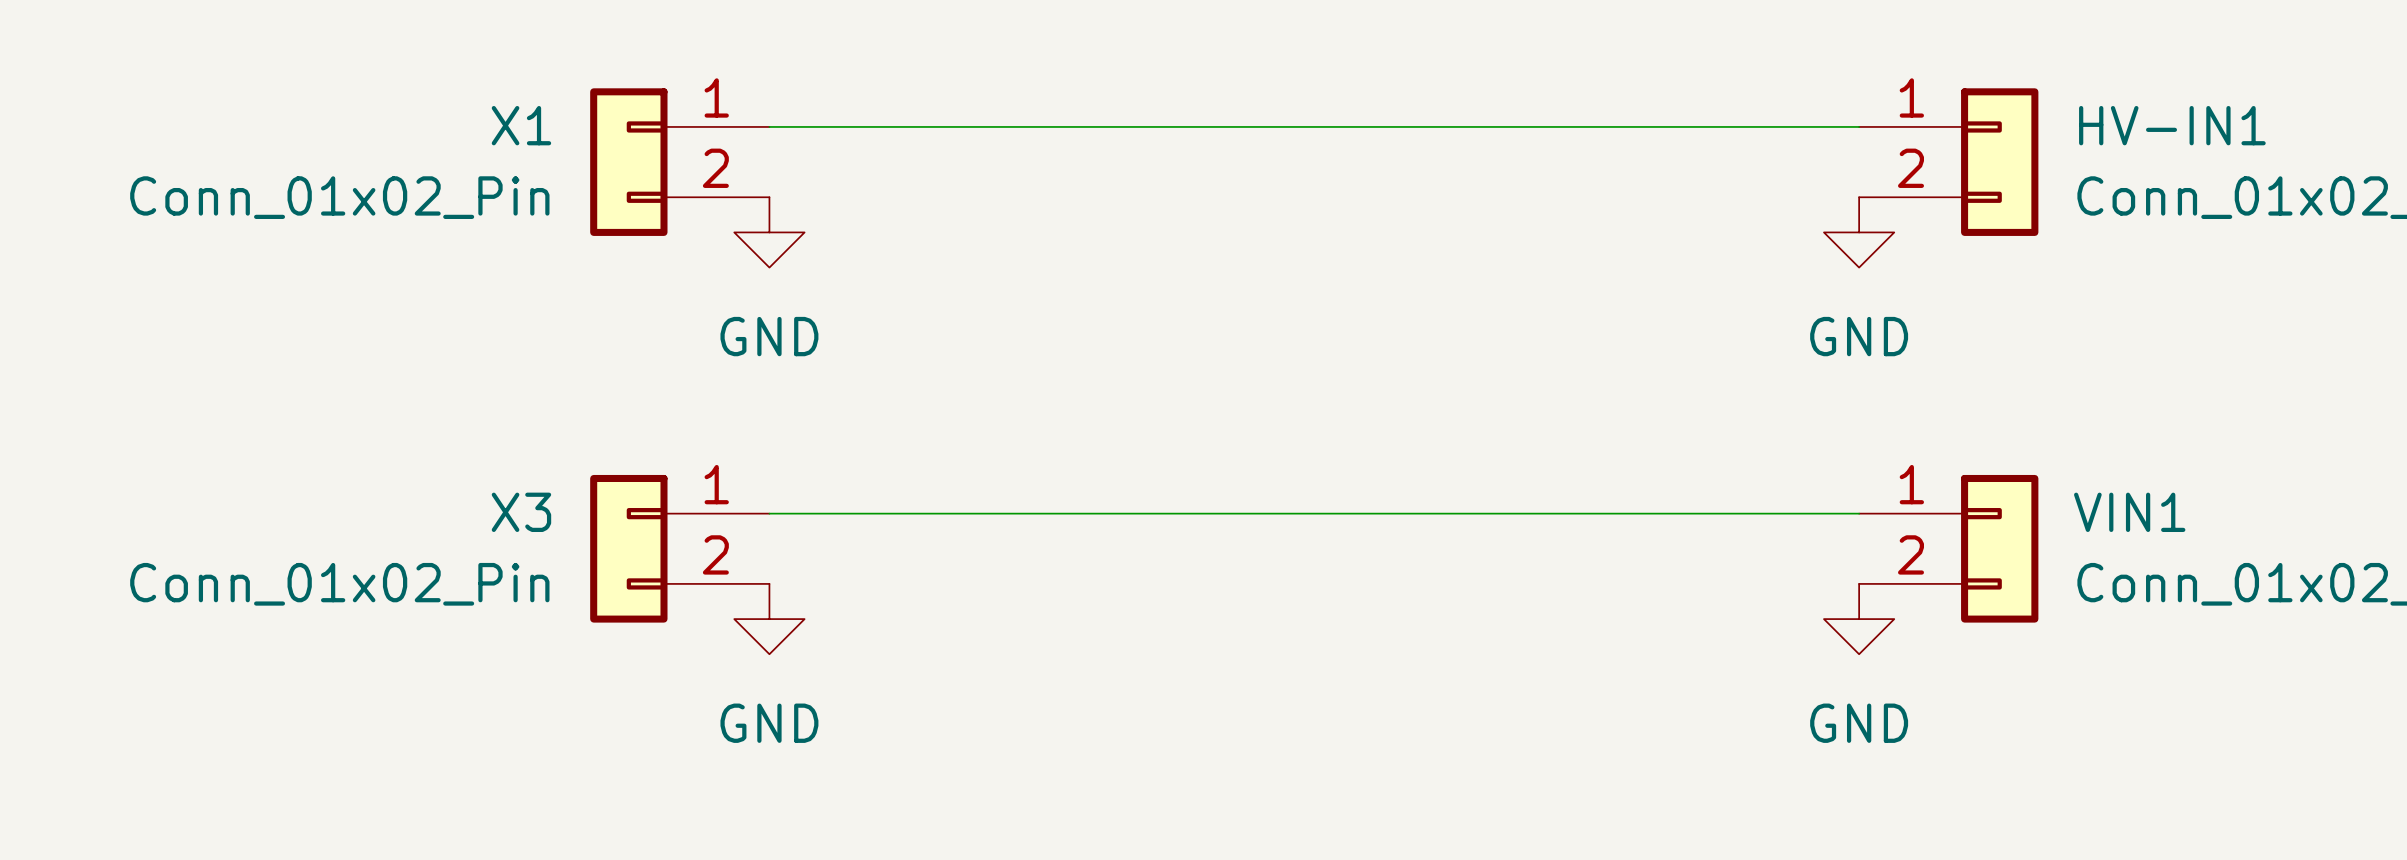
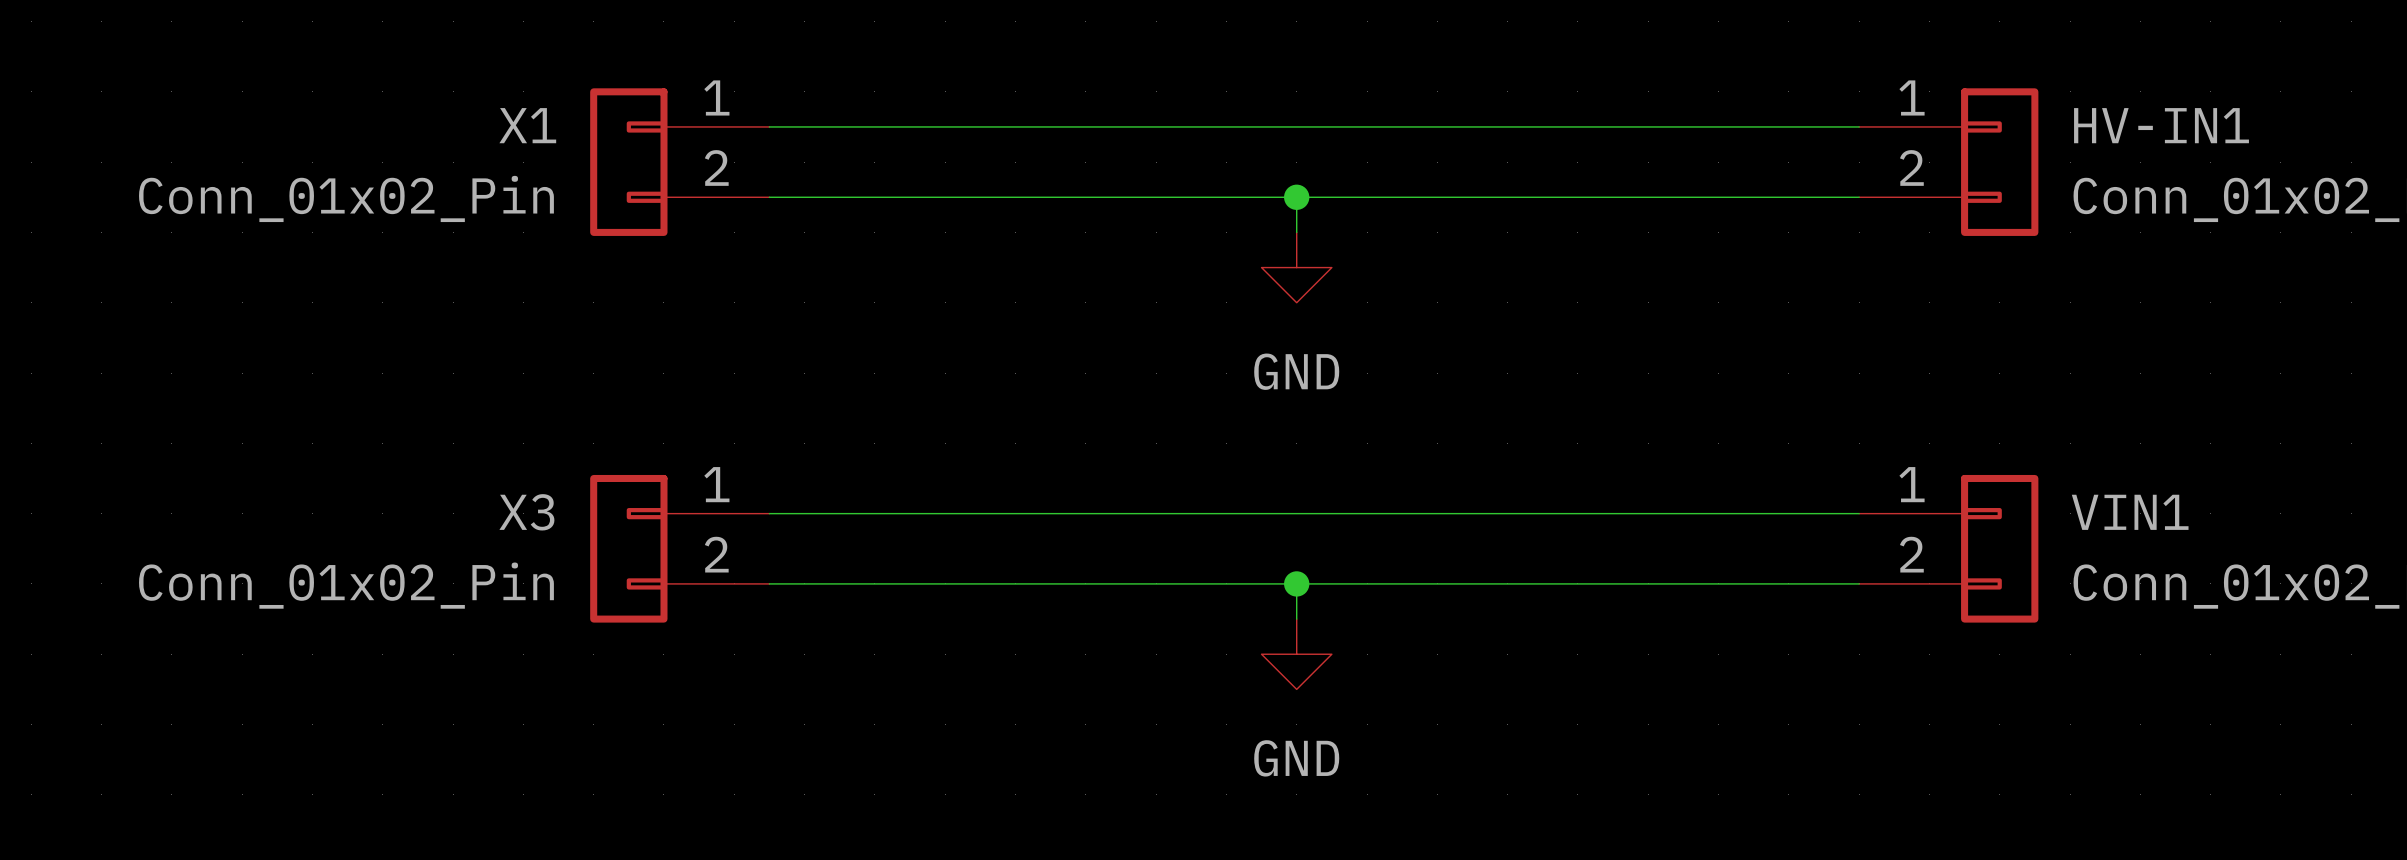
wire: none -> (769, 197) (1859, 197)
wire: none -> (1296, 197) (1296, 232)
junction: none -> (1296, 197)
power symbol: GND (769, 232) -> none
power symbol: GND (1859, 232) -> none
power symbol: none -> GND (1296, 267)
wire: none -> (769, 583) (1859, 583)
wire: none -> (1296, 583) (1296, 619)
junction: none -> (1296, 583)
power symbol: GND (769, 619) -> none
power symbol: GND (1859, 619) -> none
power symbol: none -> GND (1296, 654)

